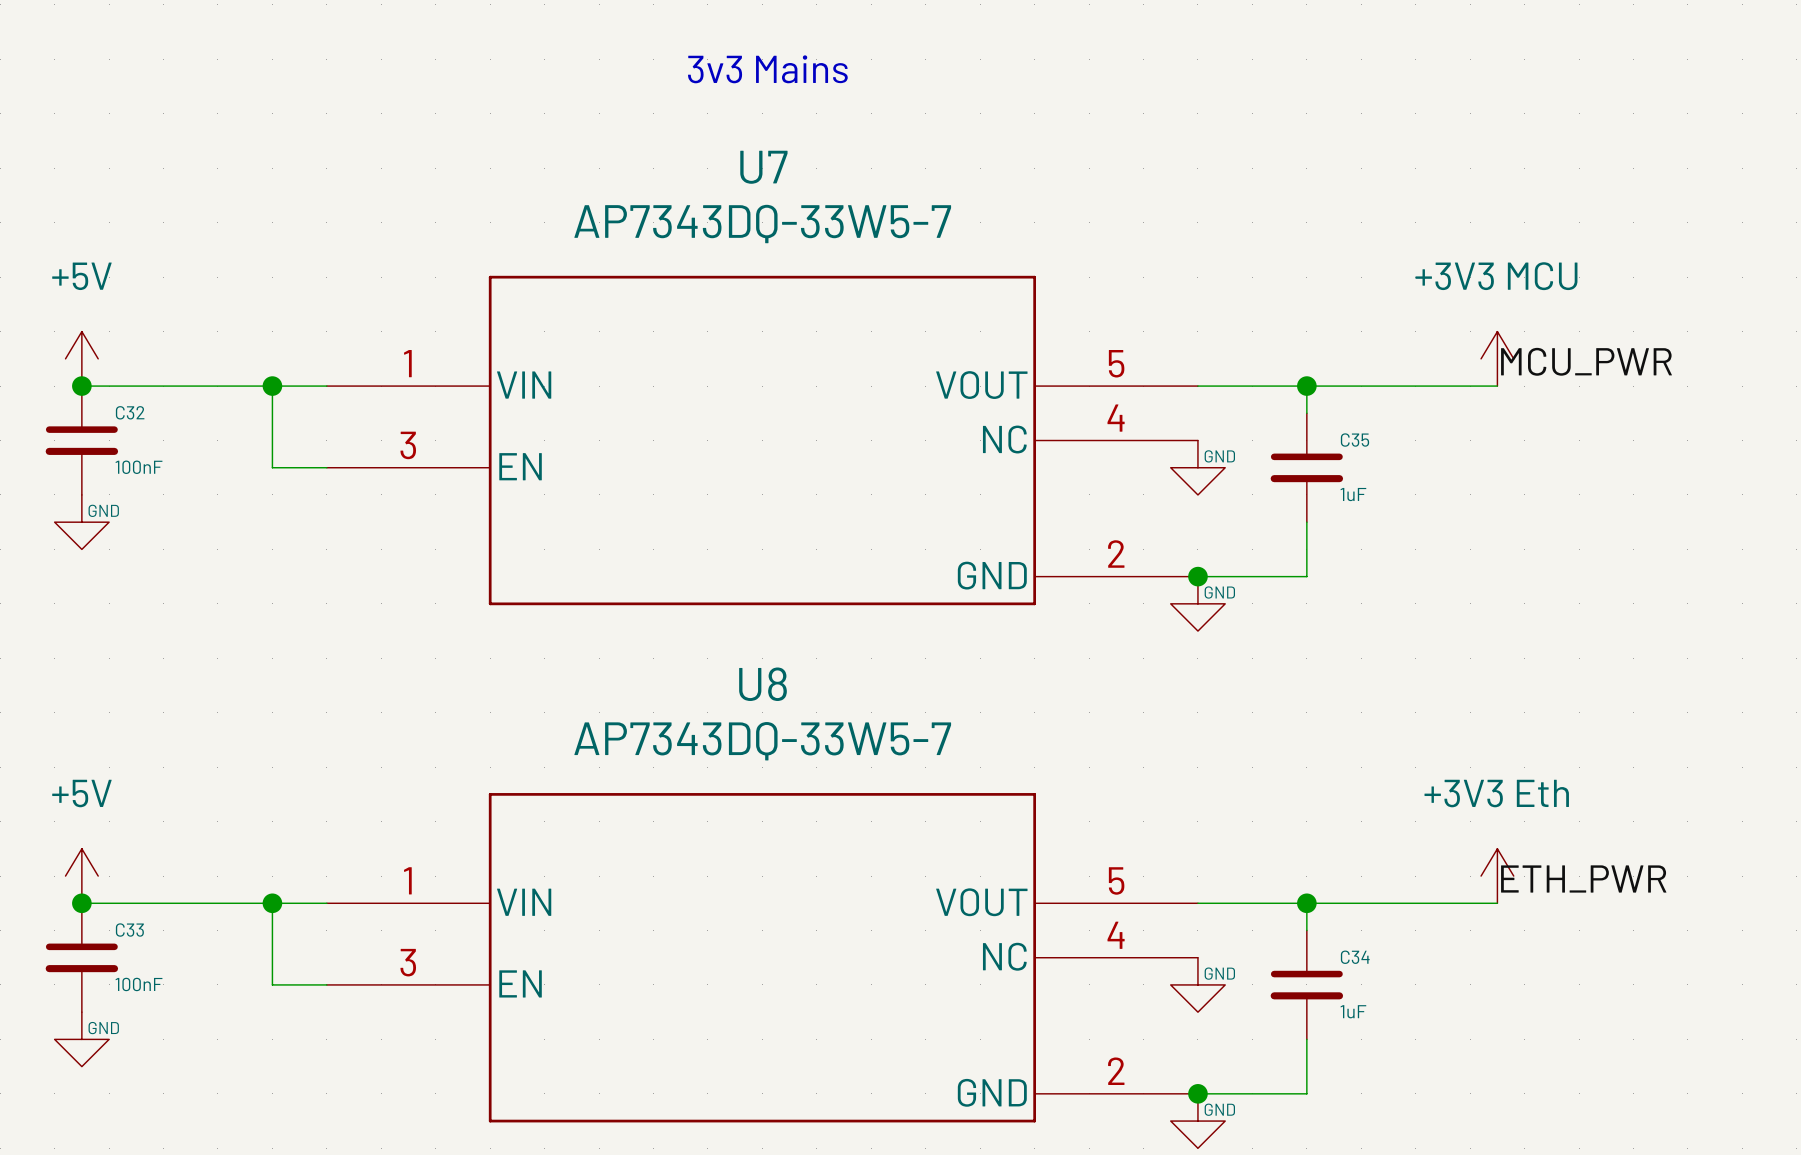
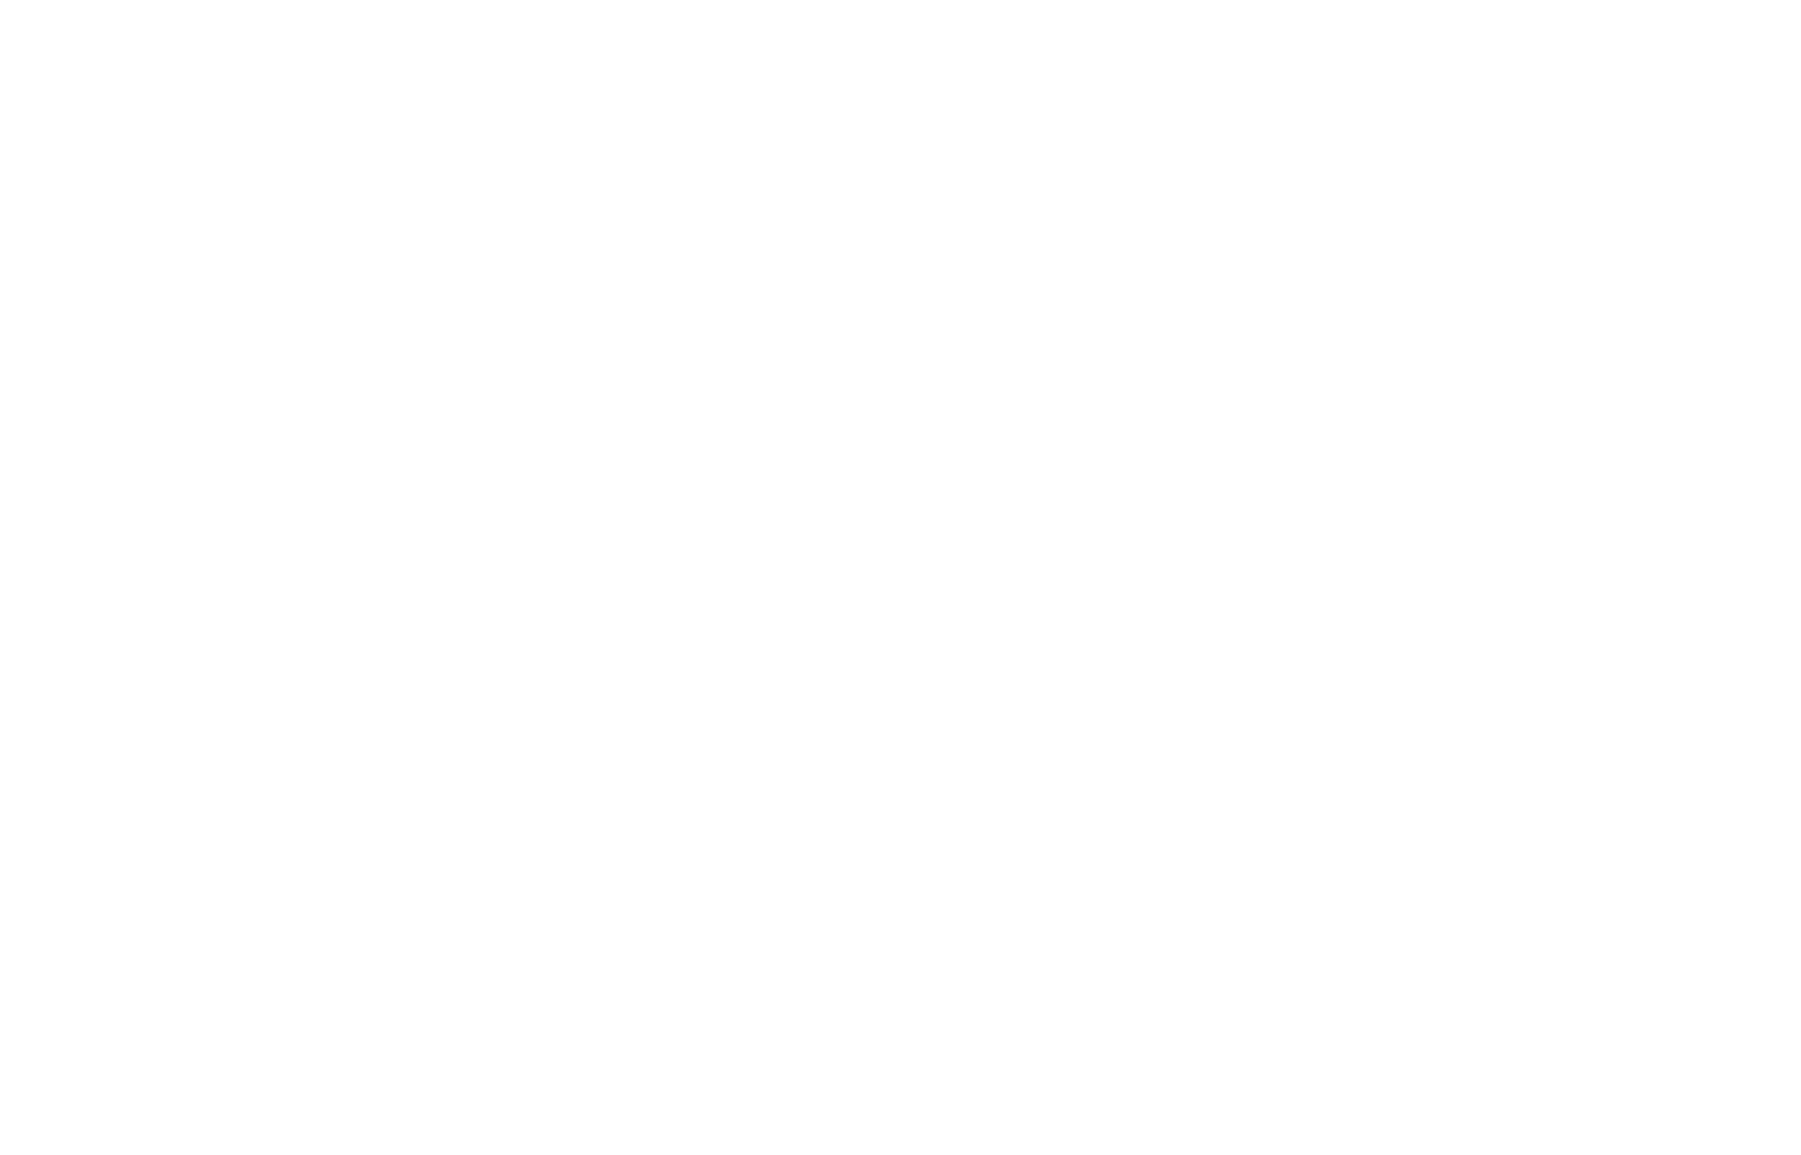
text: 3v3 Mains (767, 69) -> none
power symbol: +5V (81, 358) -> none
power symbol: +3V3 MCU (1497, 358) -> none
label: MCU_PWR (1586, 361) -> none
wire: (81, 386) (326, 386) -> none
junction: (81, 386) -> none
wire: (272, 386) (272, 467) (326, 467) -> none
junction: (272, 386) -> none
wire: (1197, 386) (1497, 386) -> none
wire: (1306, 386) (1306, 413) -> none
junction: (1306, 386) -> none
C32: 100nF (81, 440) -> none
U7: AP7343DQ-33W5-7 (762, 440) -> none
power symbol: GND (1197, 467) -> none
C35: 1uF (1306, 467) -> none
power symbol: GND (81, 522) -> none
wire: (1306, 522) (1306, 576) (1197, 576) -> none
junction: (1197, 576) -> none
power symbol: GND (1197, 603) -> none
power symbol: +5V (81, 876) -> none
power symbol: +3V3 Eth (1497, 876) -> none
label: ETH_PWR (1583, 878) -> none
wire: (81, 903) (326, 903) -> none
junction: (81, 903) -> none
wire: (272, 903) (272, 984) (326, 984) -> none
junction: (272, 903) -> none
wire: (1197, 903) (1497, 903) -> none
wire: (1306, 903) (1306, 930) -> none
junction: (1306, 903) -> none
C33: 100nF (81, 957) -> none
U8: AP7343DQ-33W5-7 (762, 957) -> none
power symbol: GND (1197, 984) -> none
C34: 1uF (1306, 984) -> none
power symbol: GND (81, 1039) -> none
wire: (1306, 1039) (1306, 1093) (1197, 1093) -> none
junction: (1197, 1093) -> none
power symbol: GND (1197, 1121) -> none

